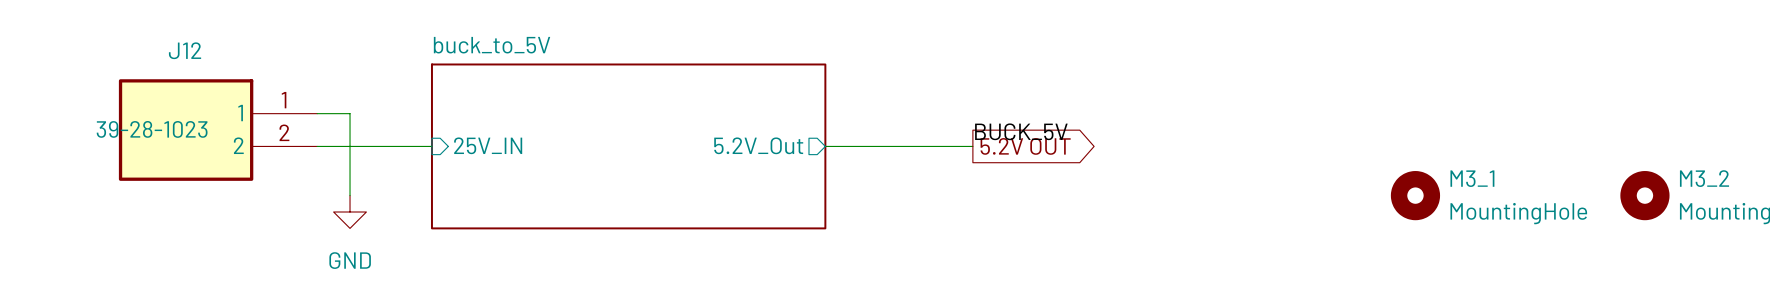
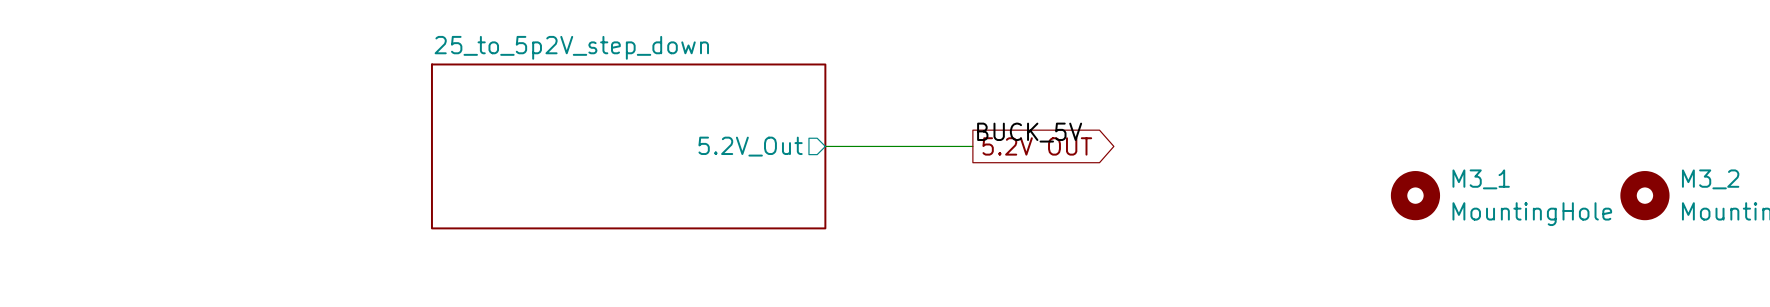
sheet buck_to_5V name: buck_to_5V (492, 45) -> 25_to_5p2V_step_down (571, 47)
wire: (317, 113) (350, 113) (350, 195) -> none
J12: 39-28-1023 (218, 130) -> none
sheet pin: 25V_IN (488, 145) -> none
wire: (317, 146) (431, 146) -> none
power symbol: GND (350, 212) -> none

